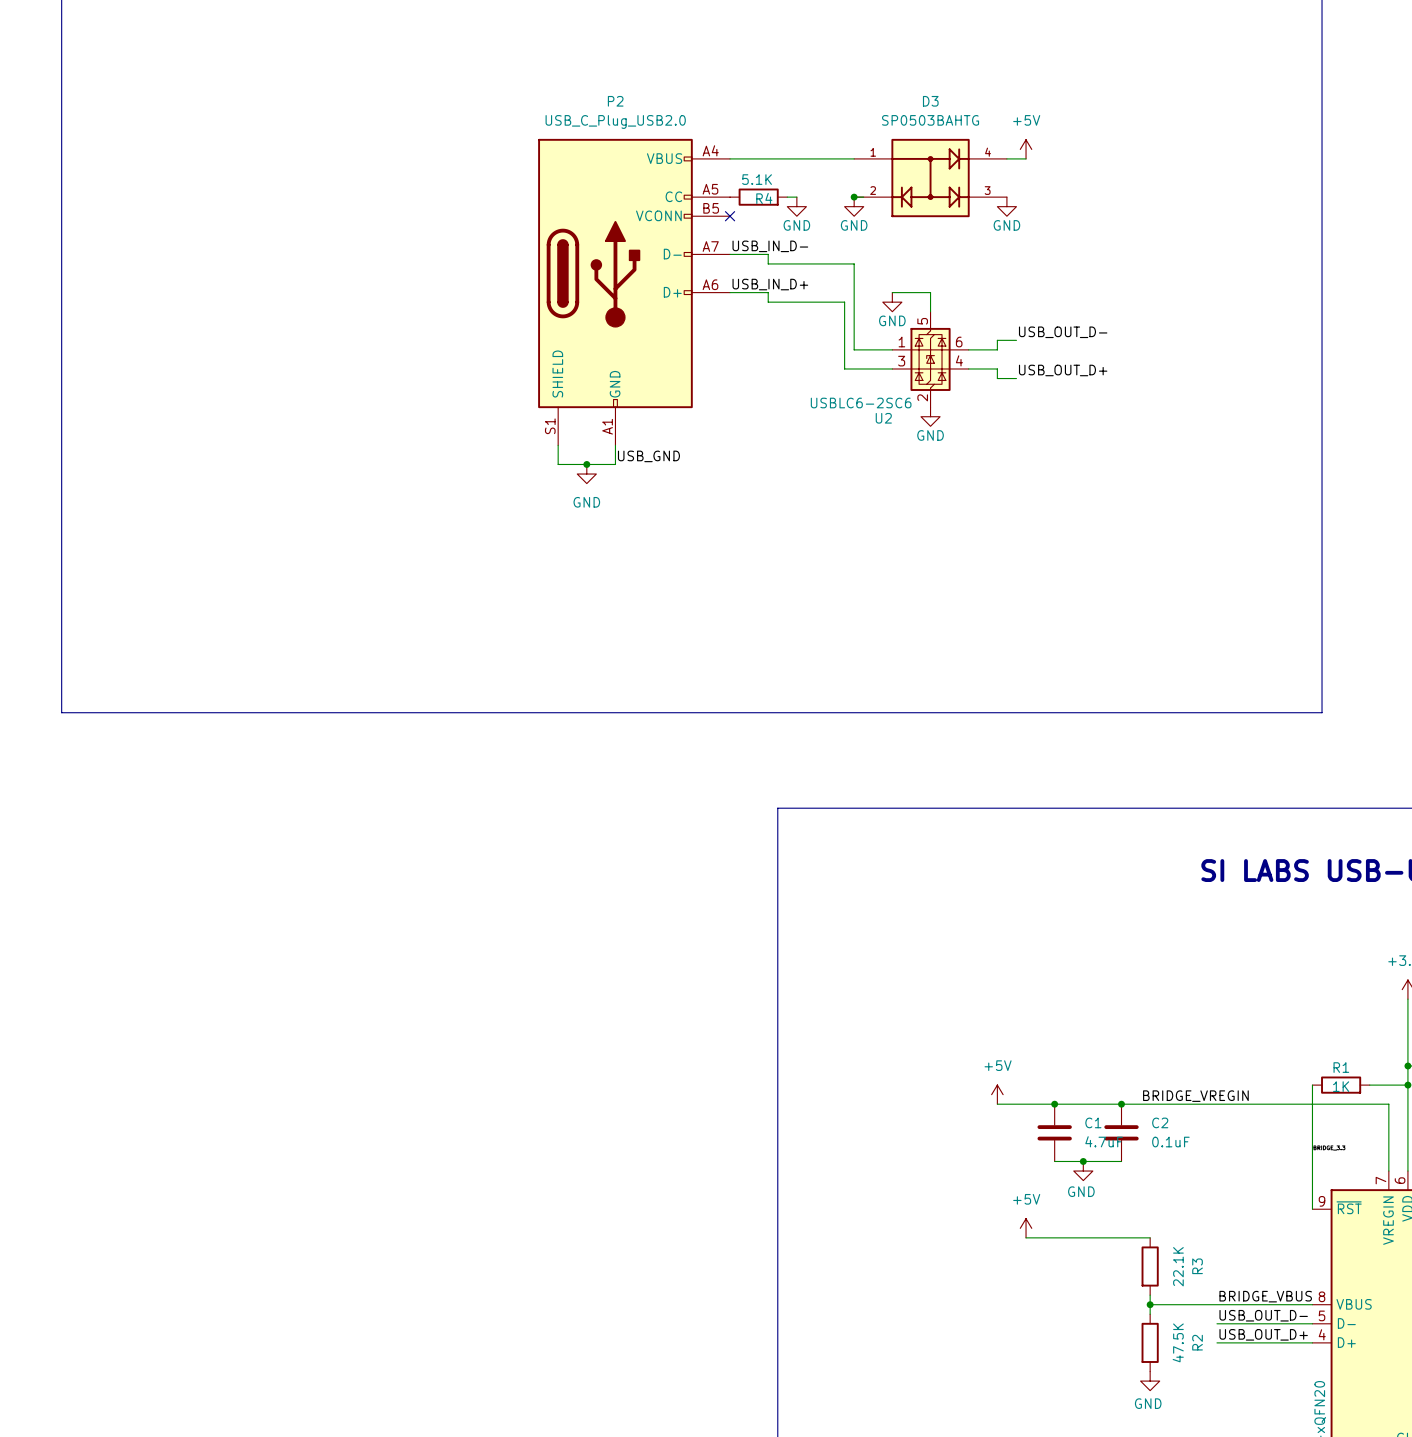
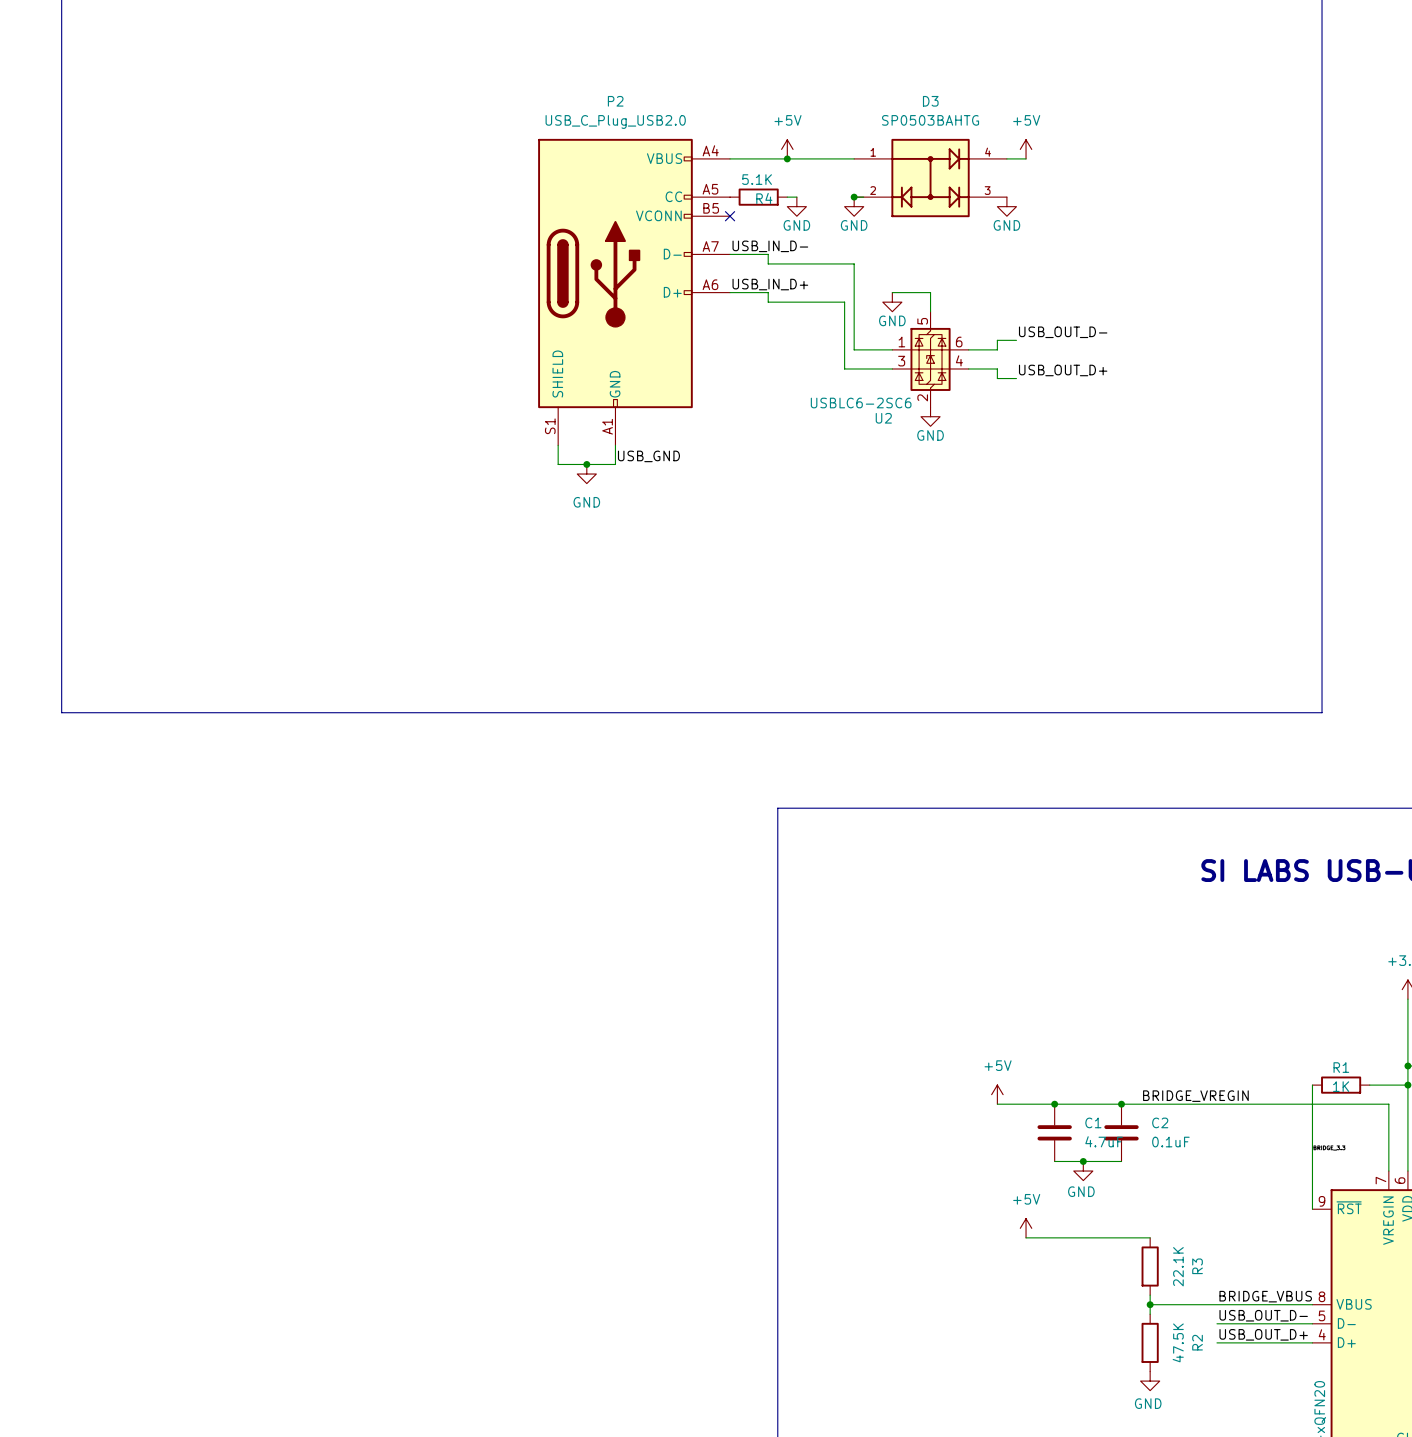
power symbol: none -> +5V (787, 149)
junction: none -> (787, 158)

